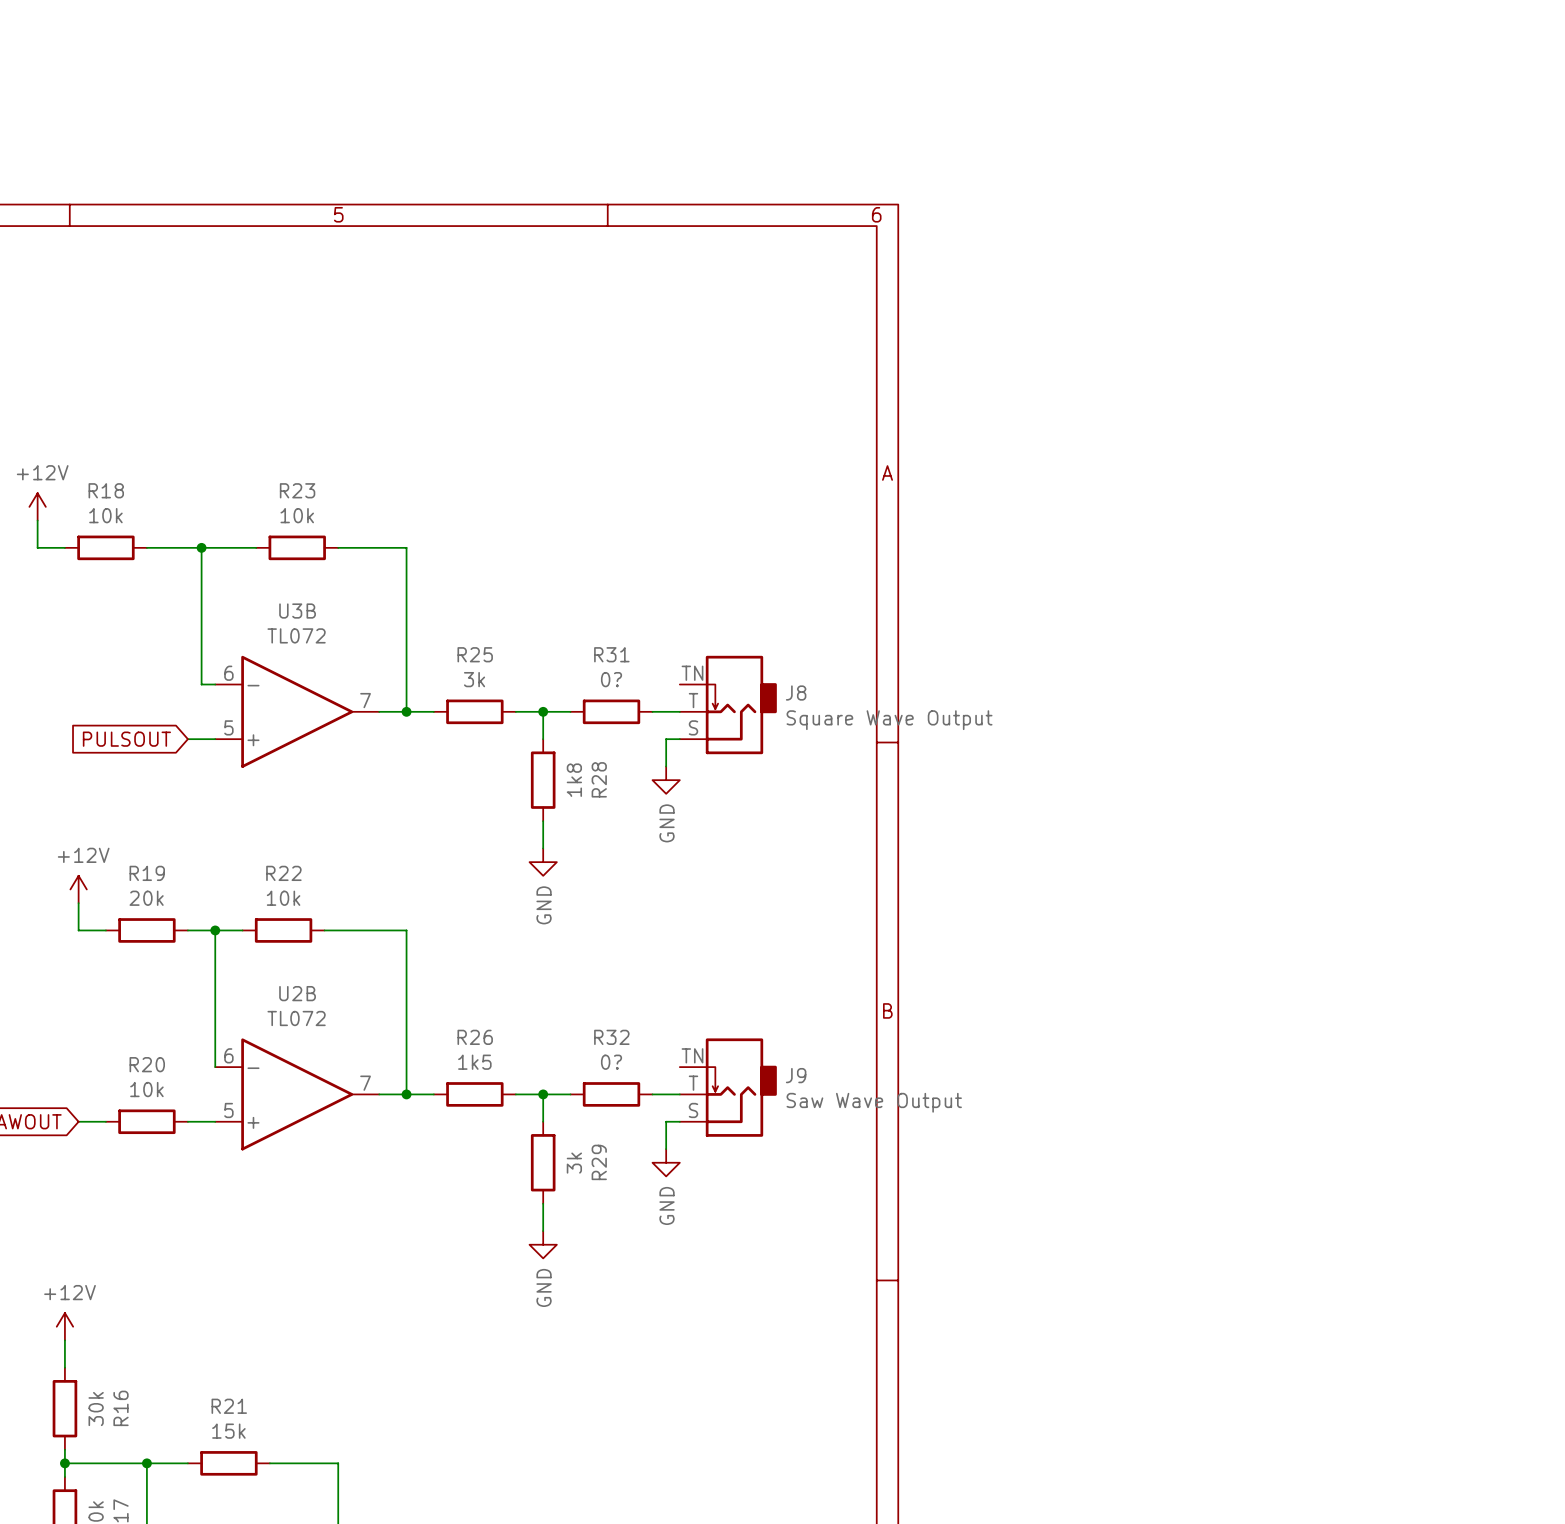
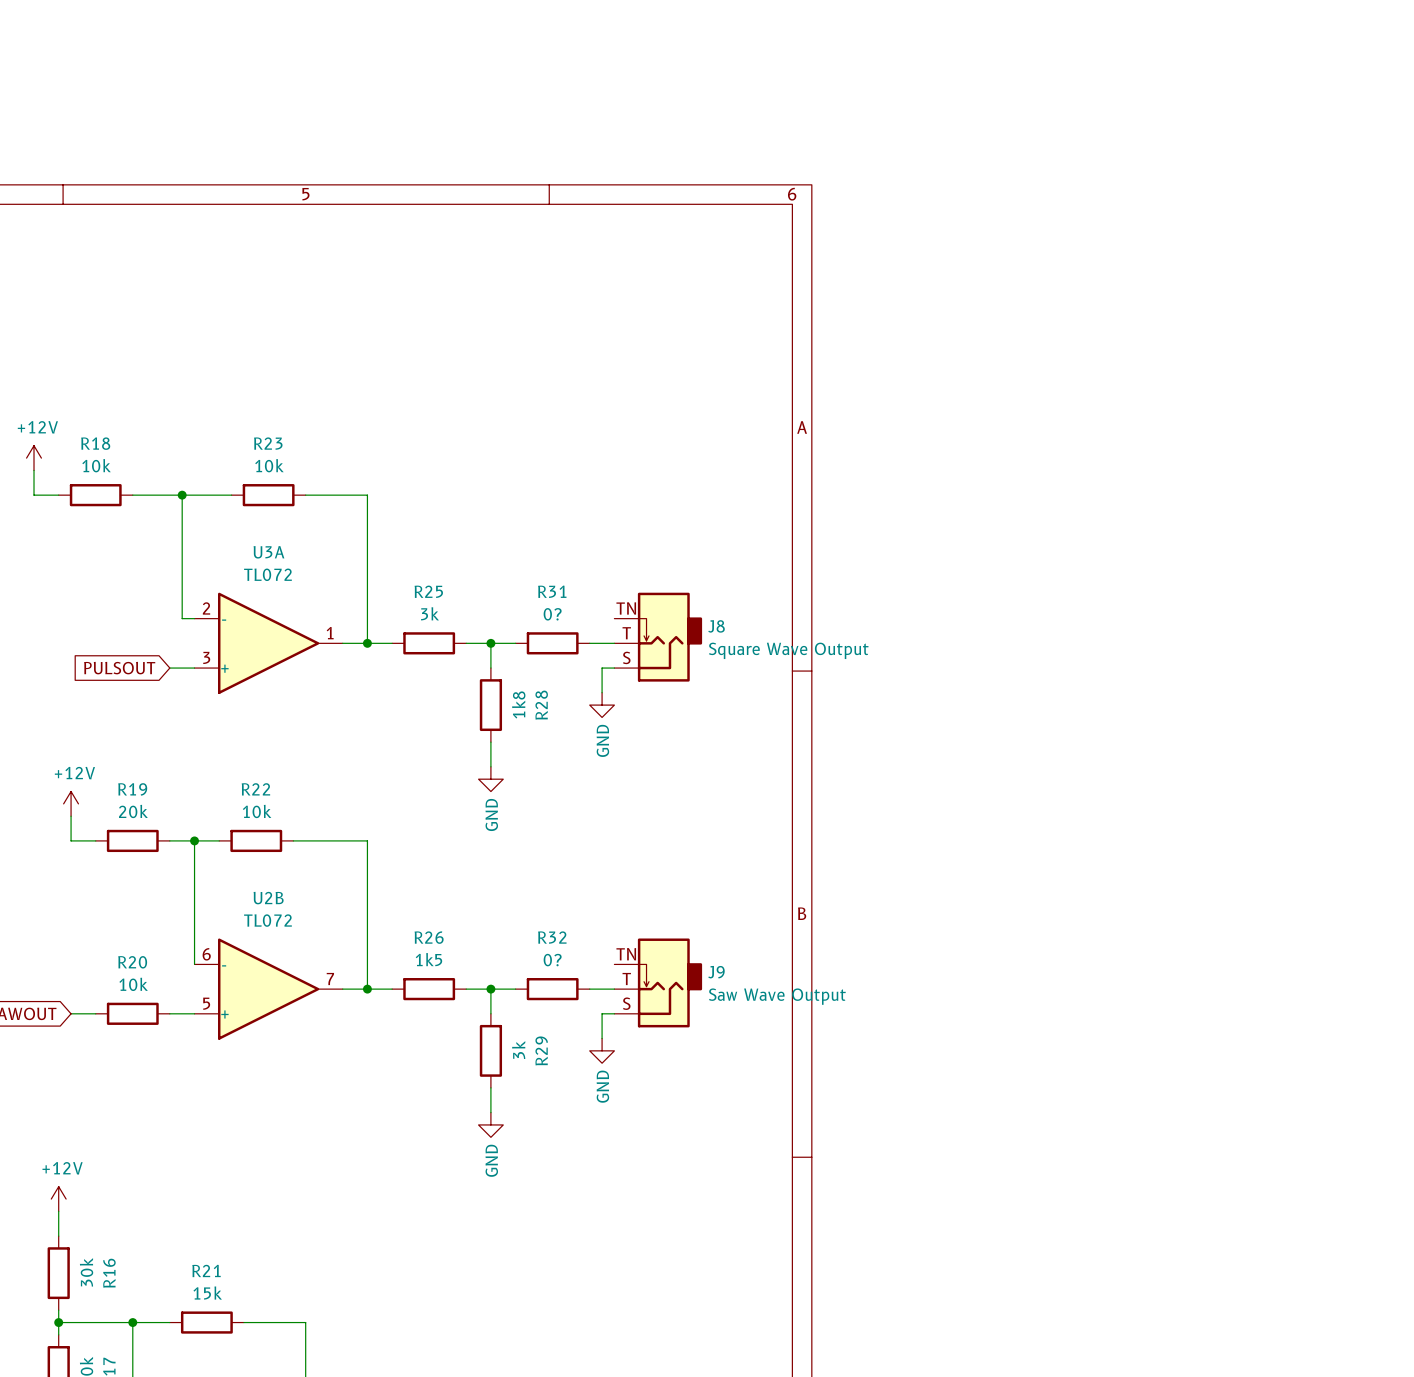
U3B name: U3B (297, 611) -> U3A (268, 552)
U3B pin number: 6 (228, 673) -> 2 (206, 608)
U3B pin number: 7 (365, 700) -> 1 (330, 633)
U3B pin number: 5 (228, 727) -> 3 (206, 657)

